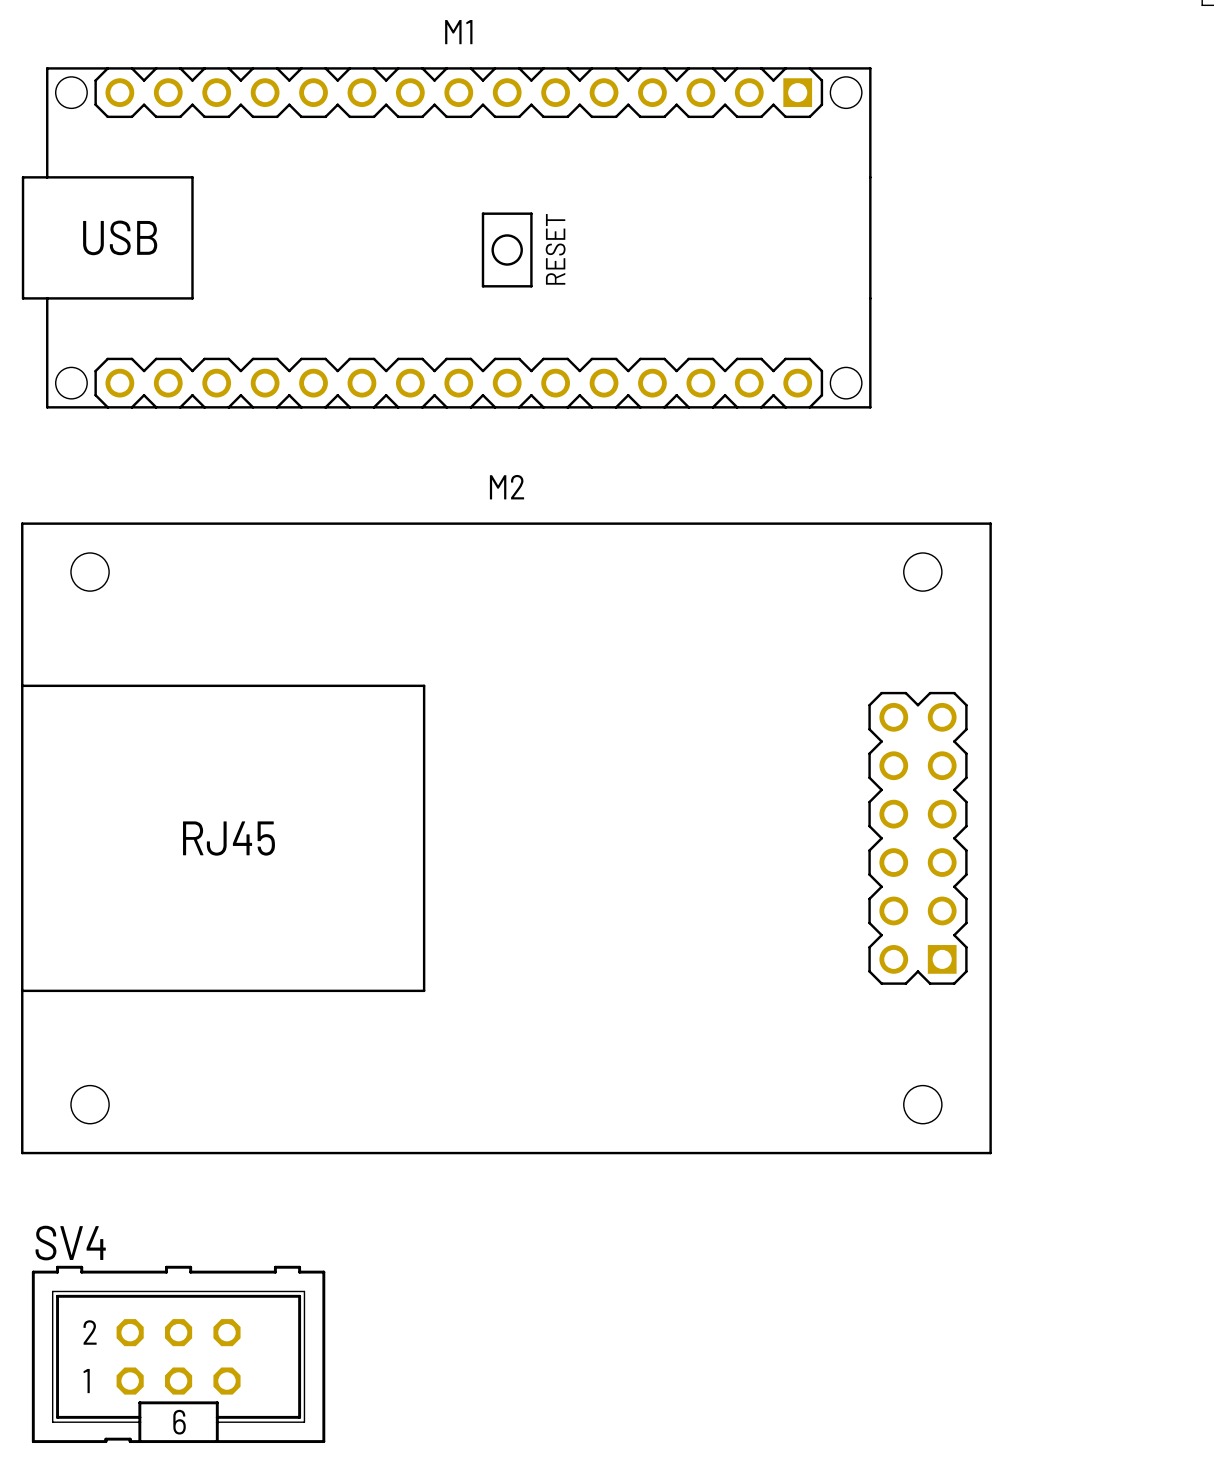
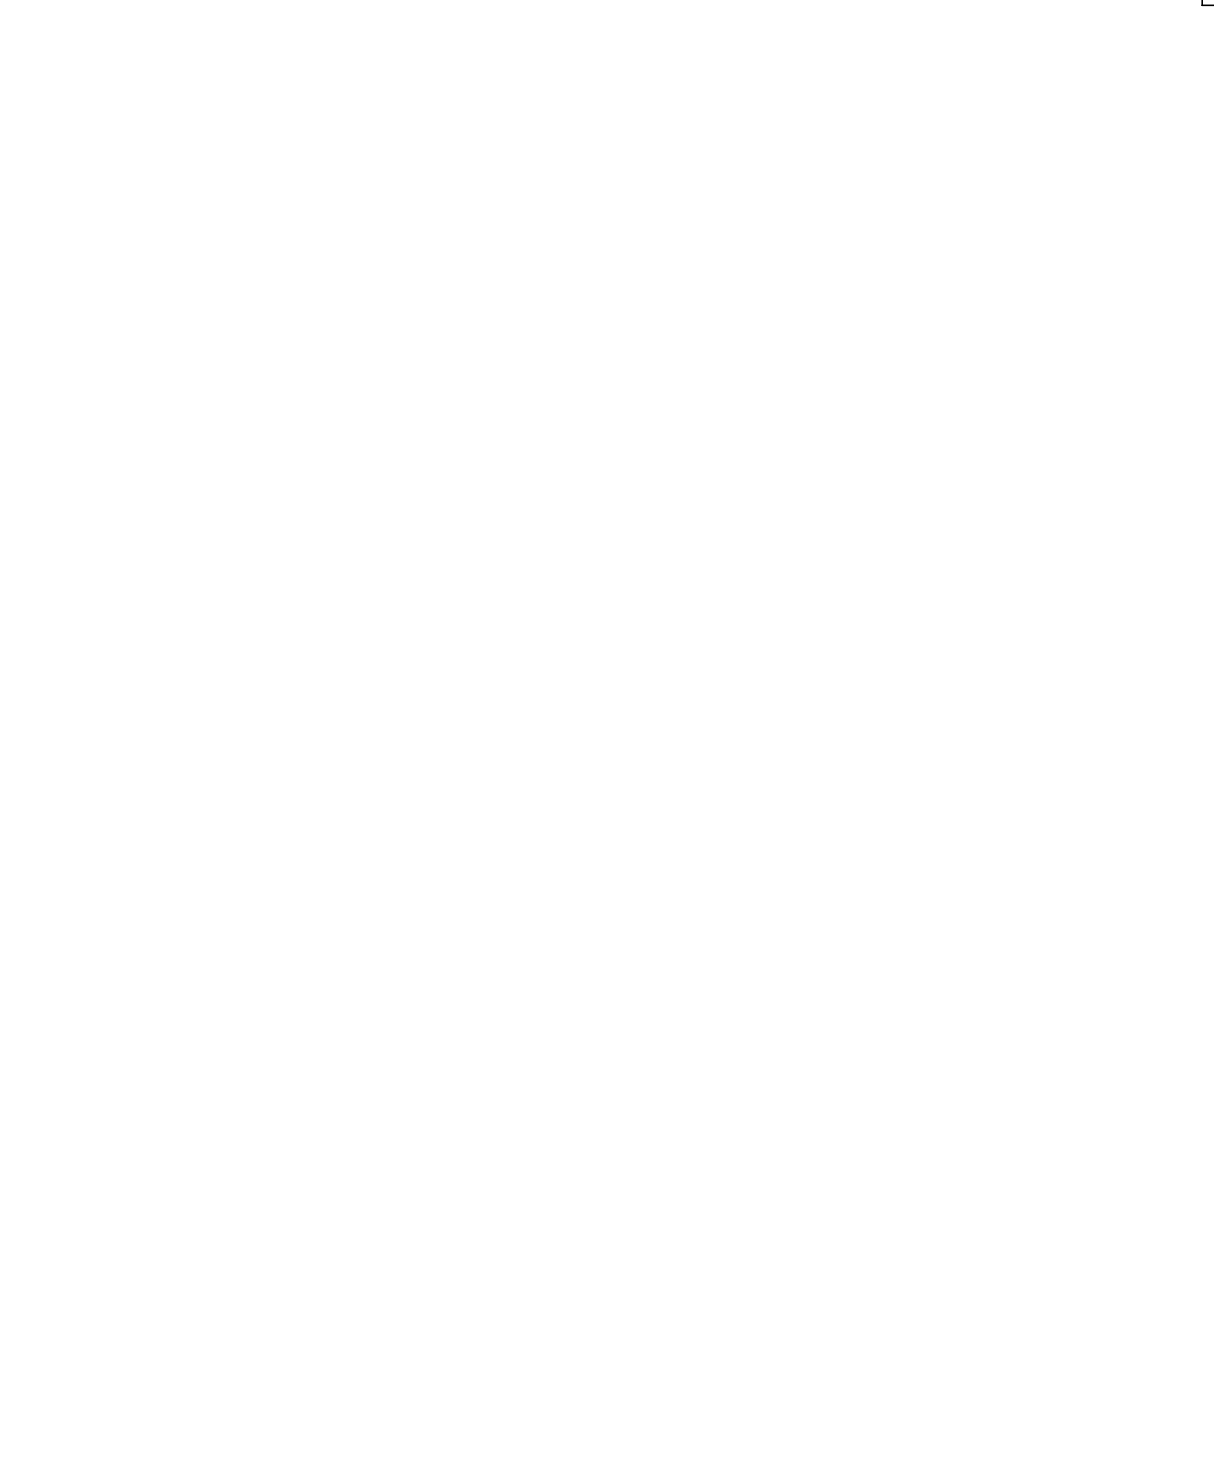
M1: (446, 237) -> none
M2: (506, 838) -> none
SV4: (178, 1354) -> none

